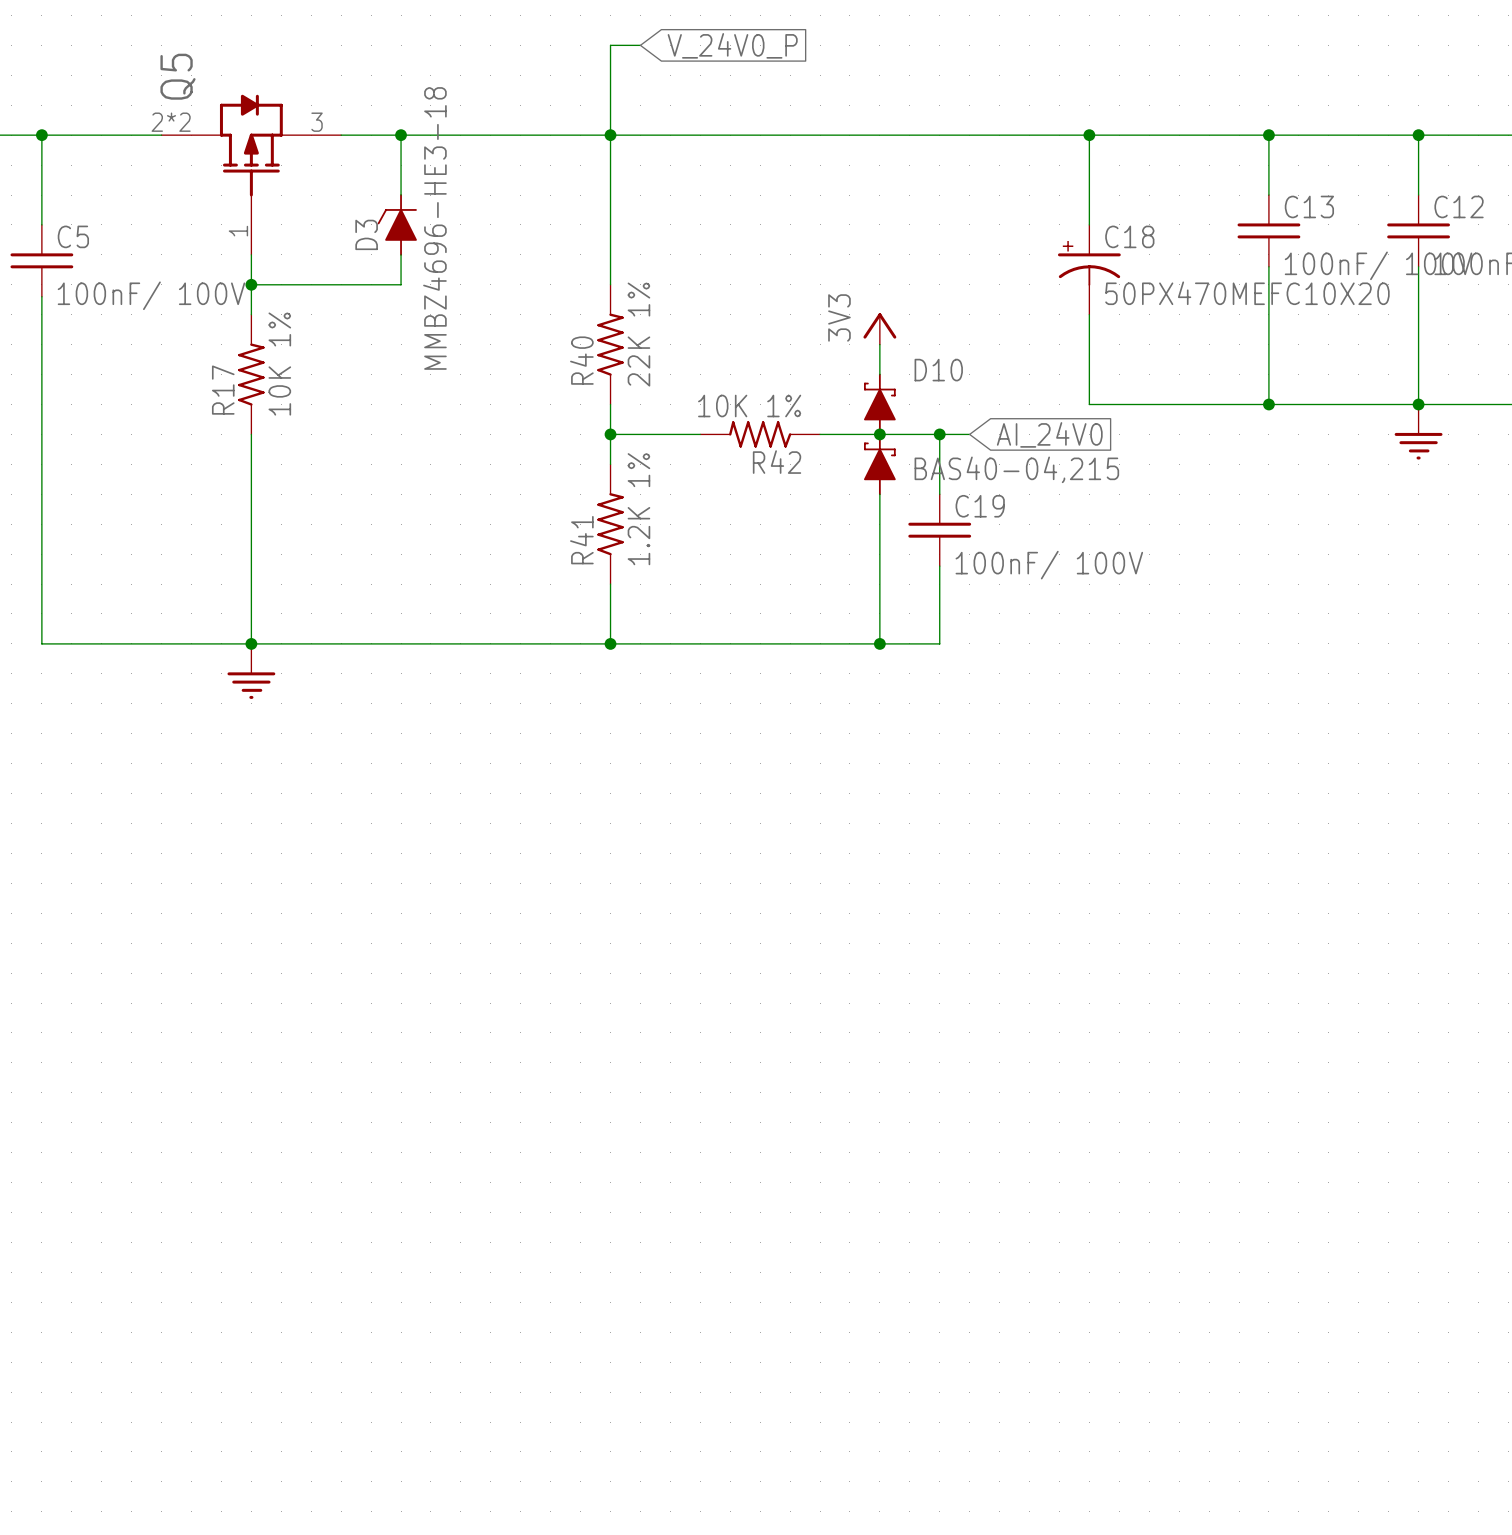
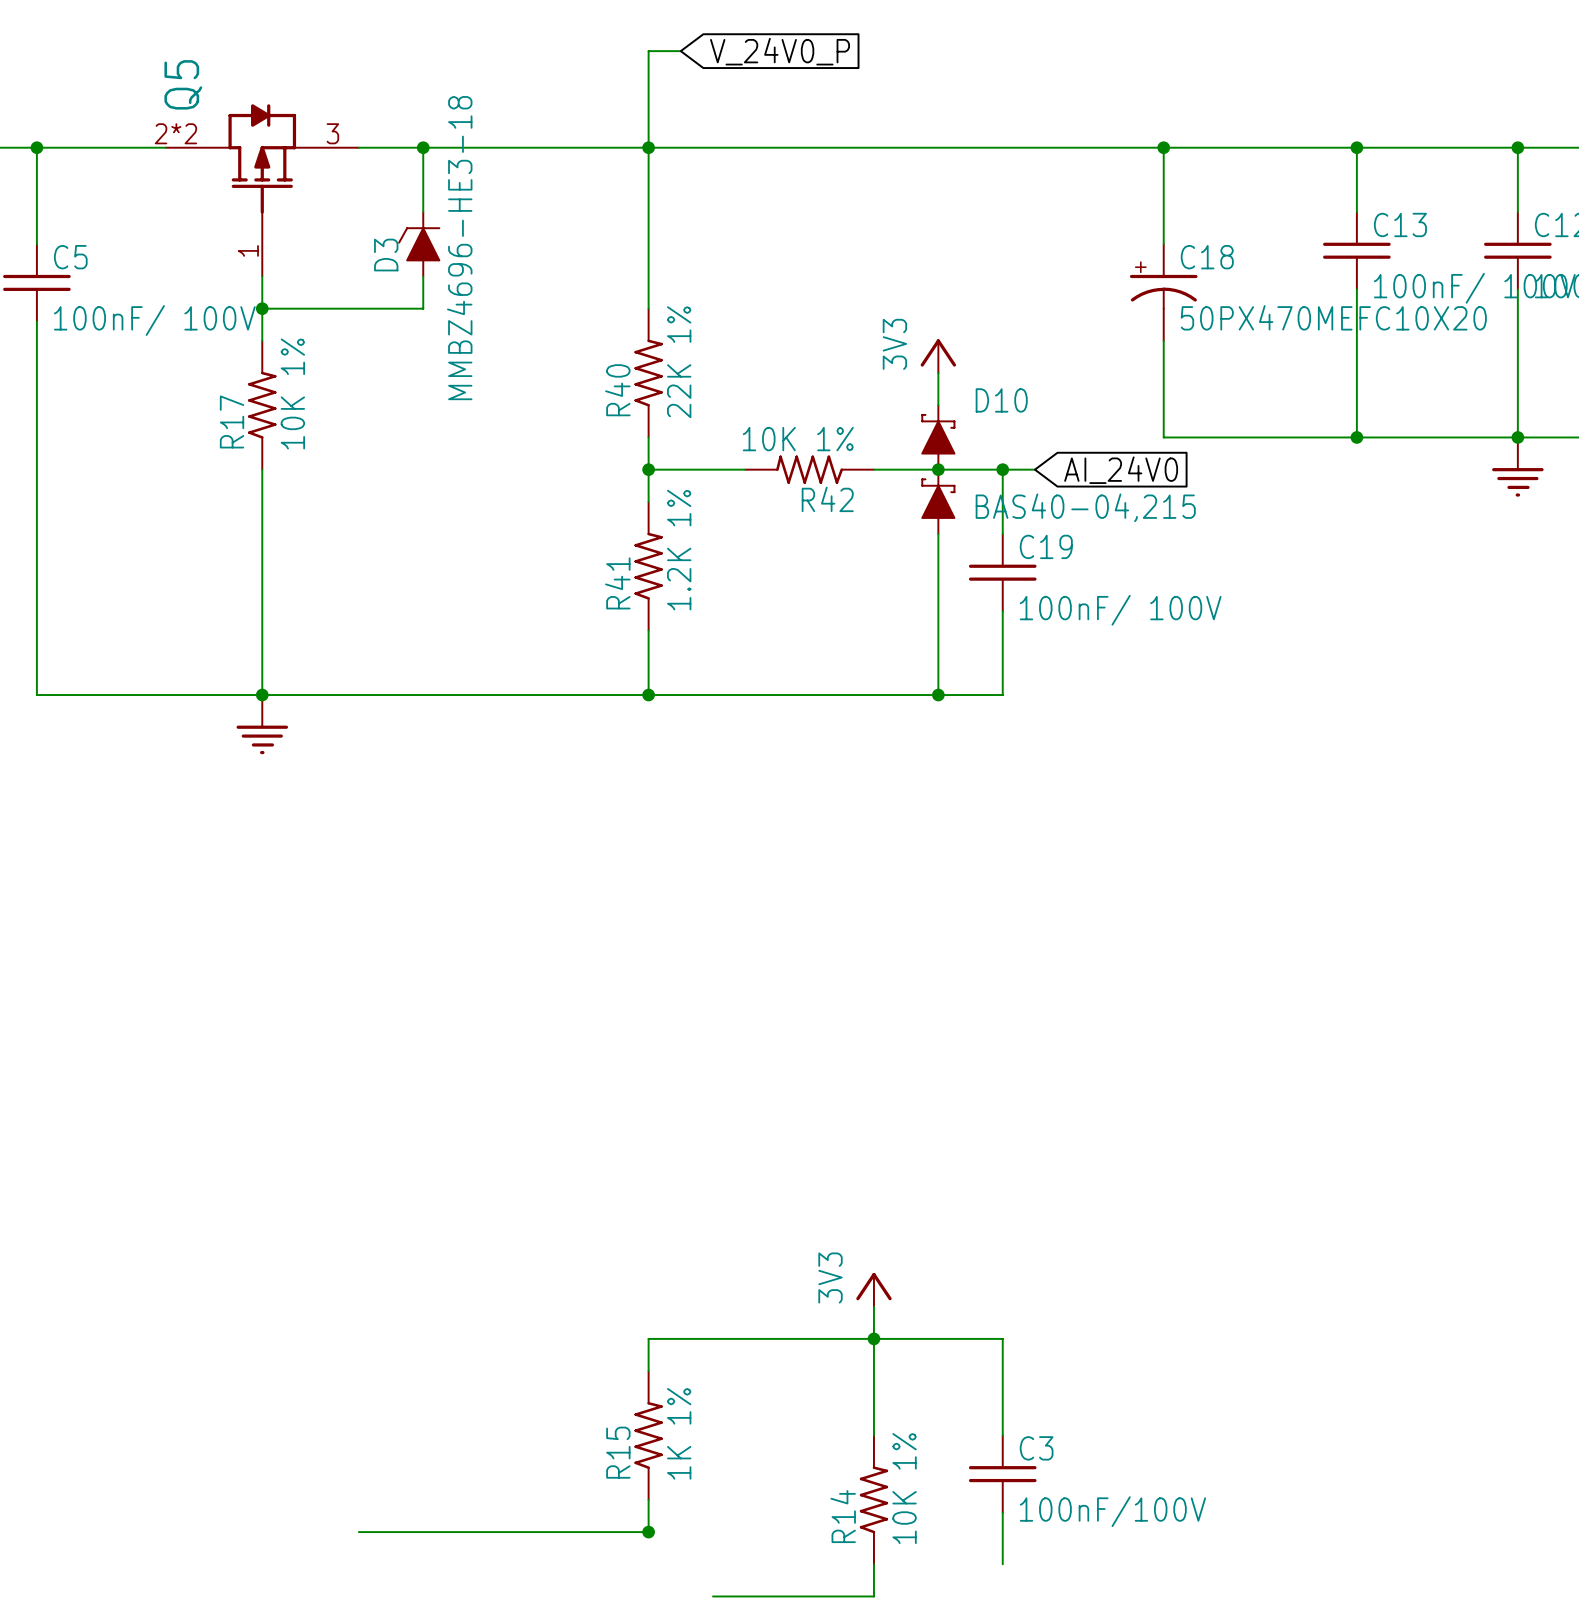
power symbol: none -> 3V3 (873, 1289)
wire: none -> (873, 1306) (873, 1435)
junction: none -> (873, 1338)
wire: none -> (648, 1371) (648, 1338) (1002, 1338) (1002, 1435)
R15: none -> 1K 1% (648, 1435)
C3: none -> 100nF/100V (1002, 1474)
wire: none -> (648, 1499) (648, 1532) (358, 1532)
R14: none -> 10K 1% (873, 1499)
wire: none -> (1002, 1512) (1002, 1564)
junction: none -> (648, 1532)
wire: none -> (873, 1564) (873, 1596) (713, 1596)

